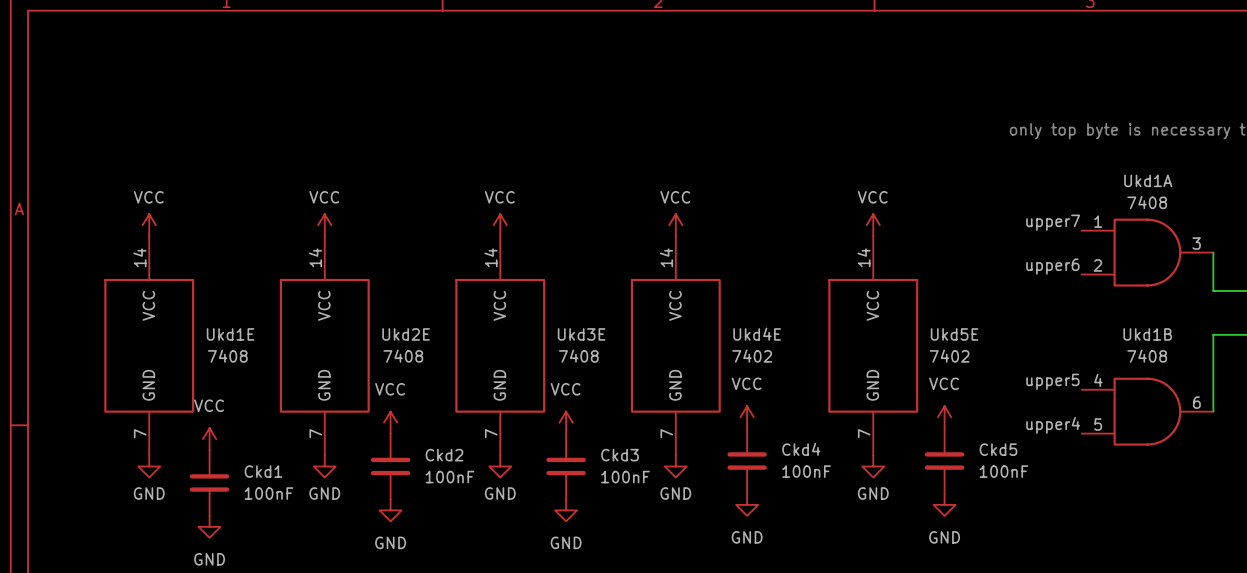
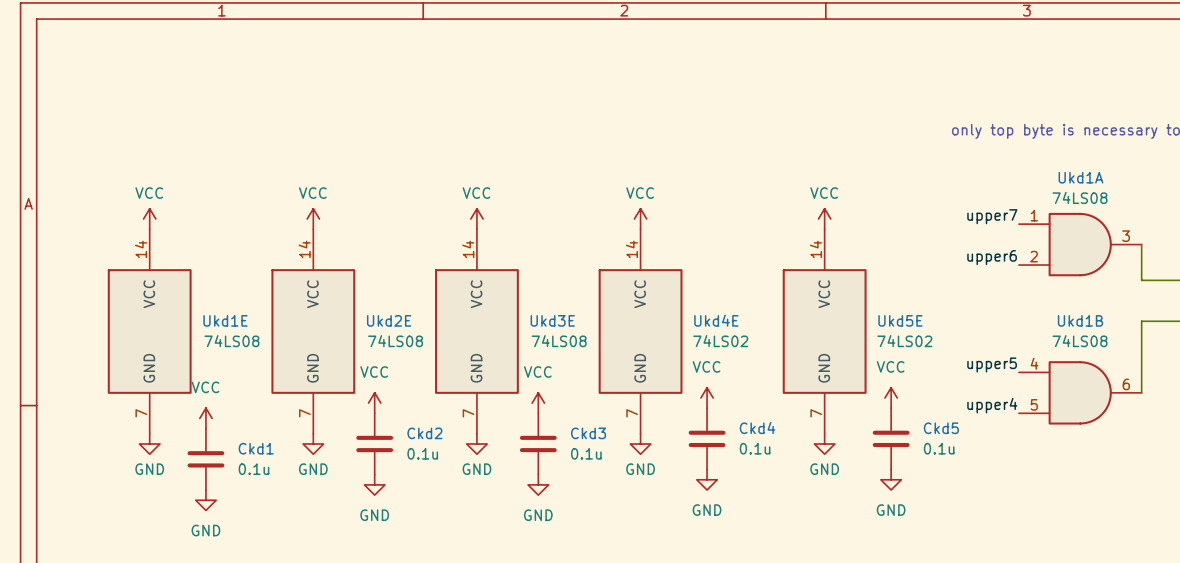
Ukd1A value: 7408 (1147, 202) -> 74LS08 (1080, 197)
Ukd1E value: 7408 (227, 356) -> 74LS08 (231, 341)
Ukd2E value: 7408 (403, 356) -> 74LS08 (395, 341)
Ukd3E value: 7408 (578, 356) -> 74LS08 (559, 341)
Ukd4E value: 7402 (752, 356) -> 74LS02 (720, 341)
Ukd5E value: 7402 (949, 356) -> 74LS02 (904, 341)
Ukd1B value: 7408 (1147, 356) -> 74LS08 (1080, 341)
Ckd4 value: 100nF (806, 471) -> 0.1u (755, 448)
Ckd5 value: 100nF (1003, 471) -> 0.1u (939, 448)
Ckd2 value: 100nF (449, 477) -> 0.1u (422, 453)
Ckd3 value: 100nF (625, 477) -> 0.1u (586, 453)
Ckd1 value: 100nF (268, 493) -> 0.1u (253, 469)

